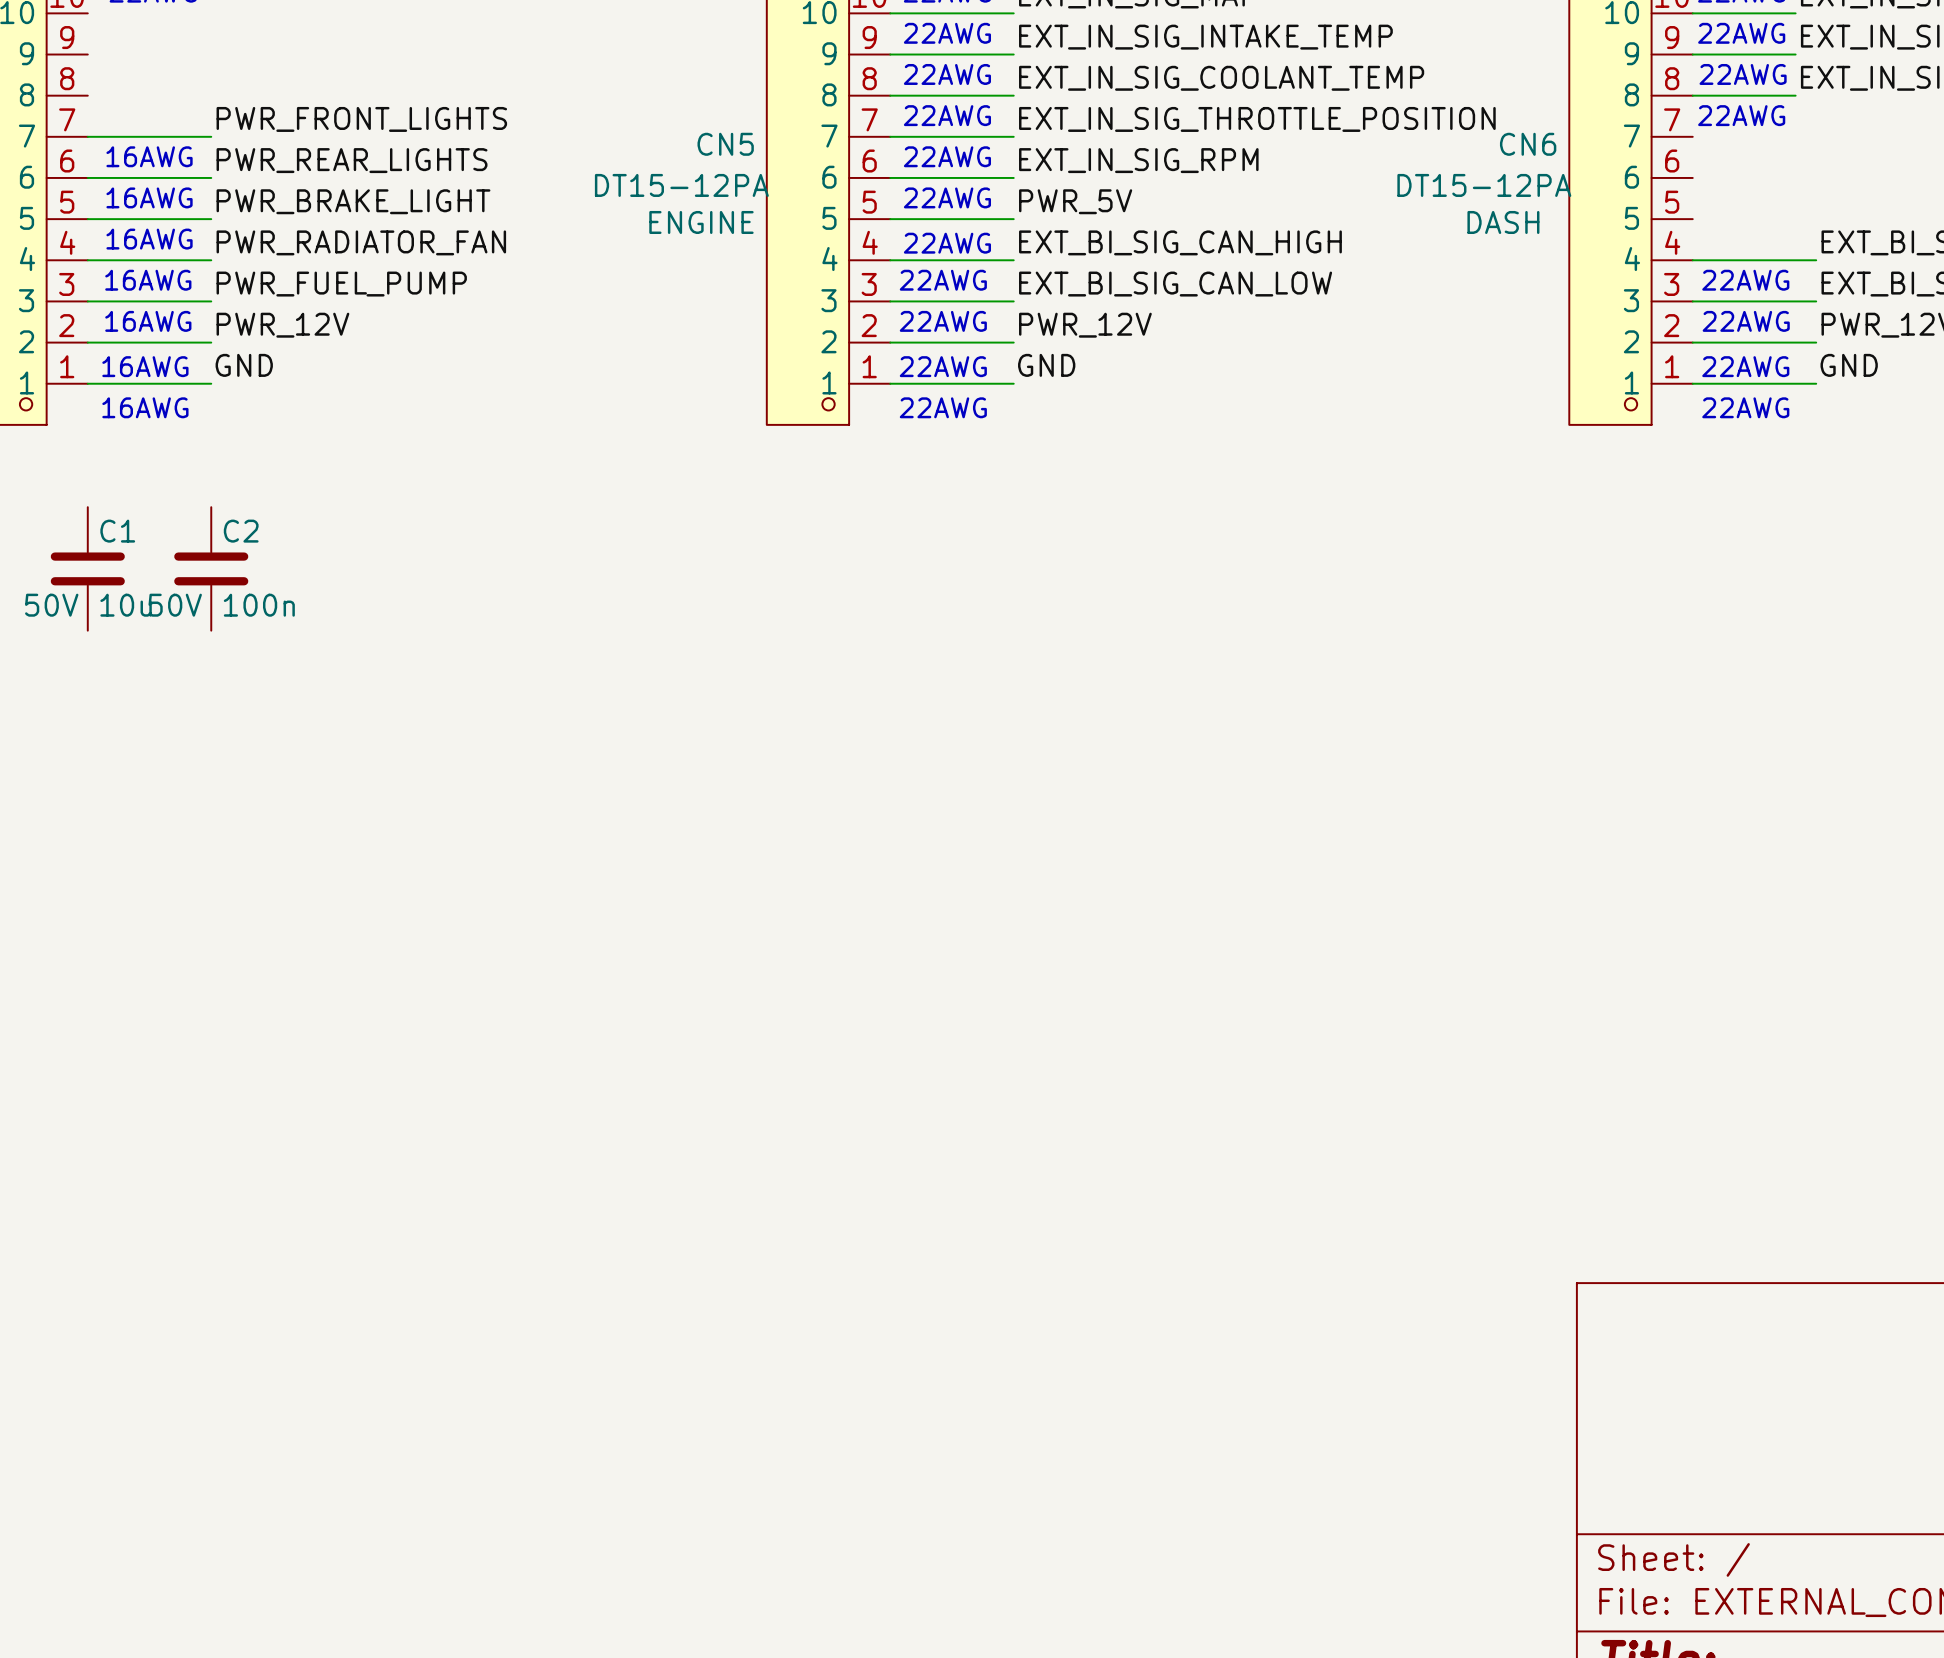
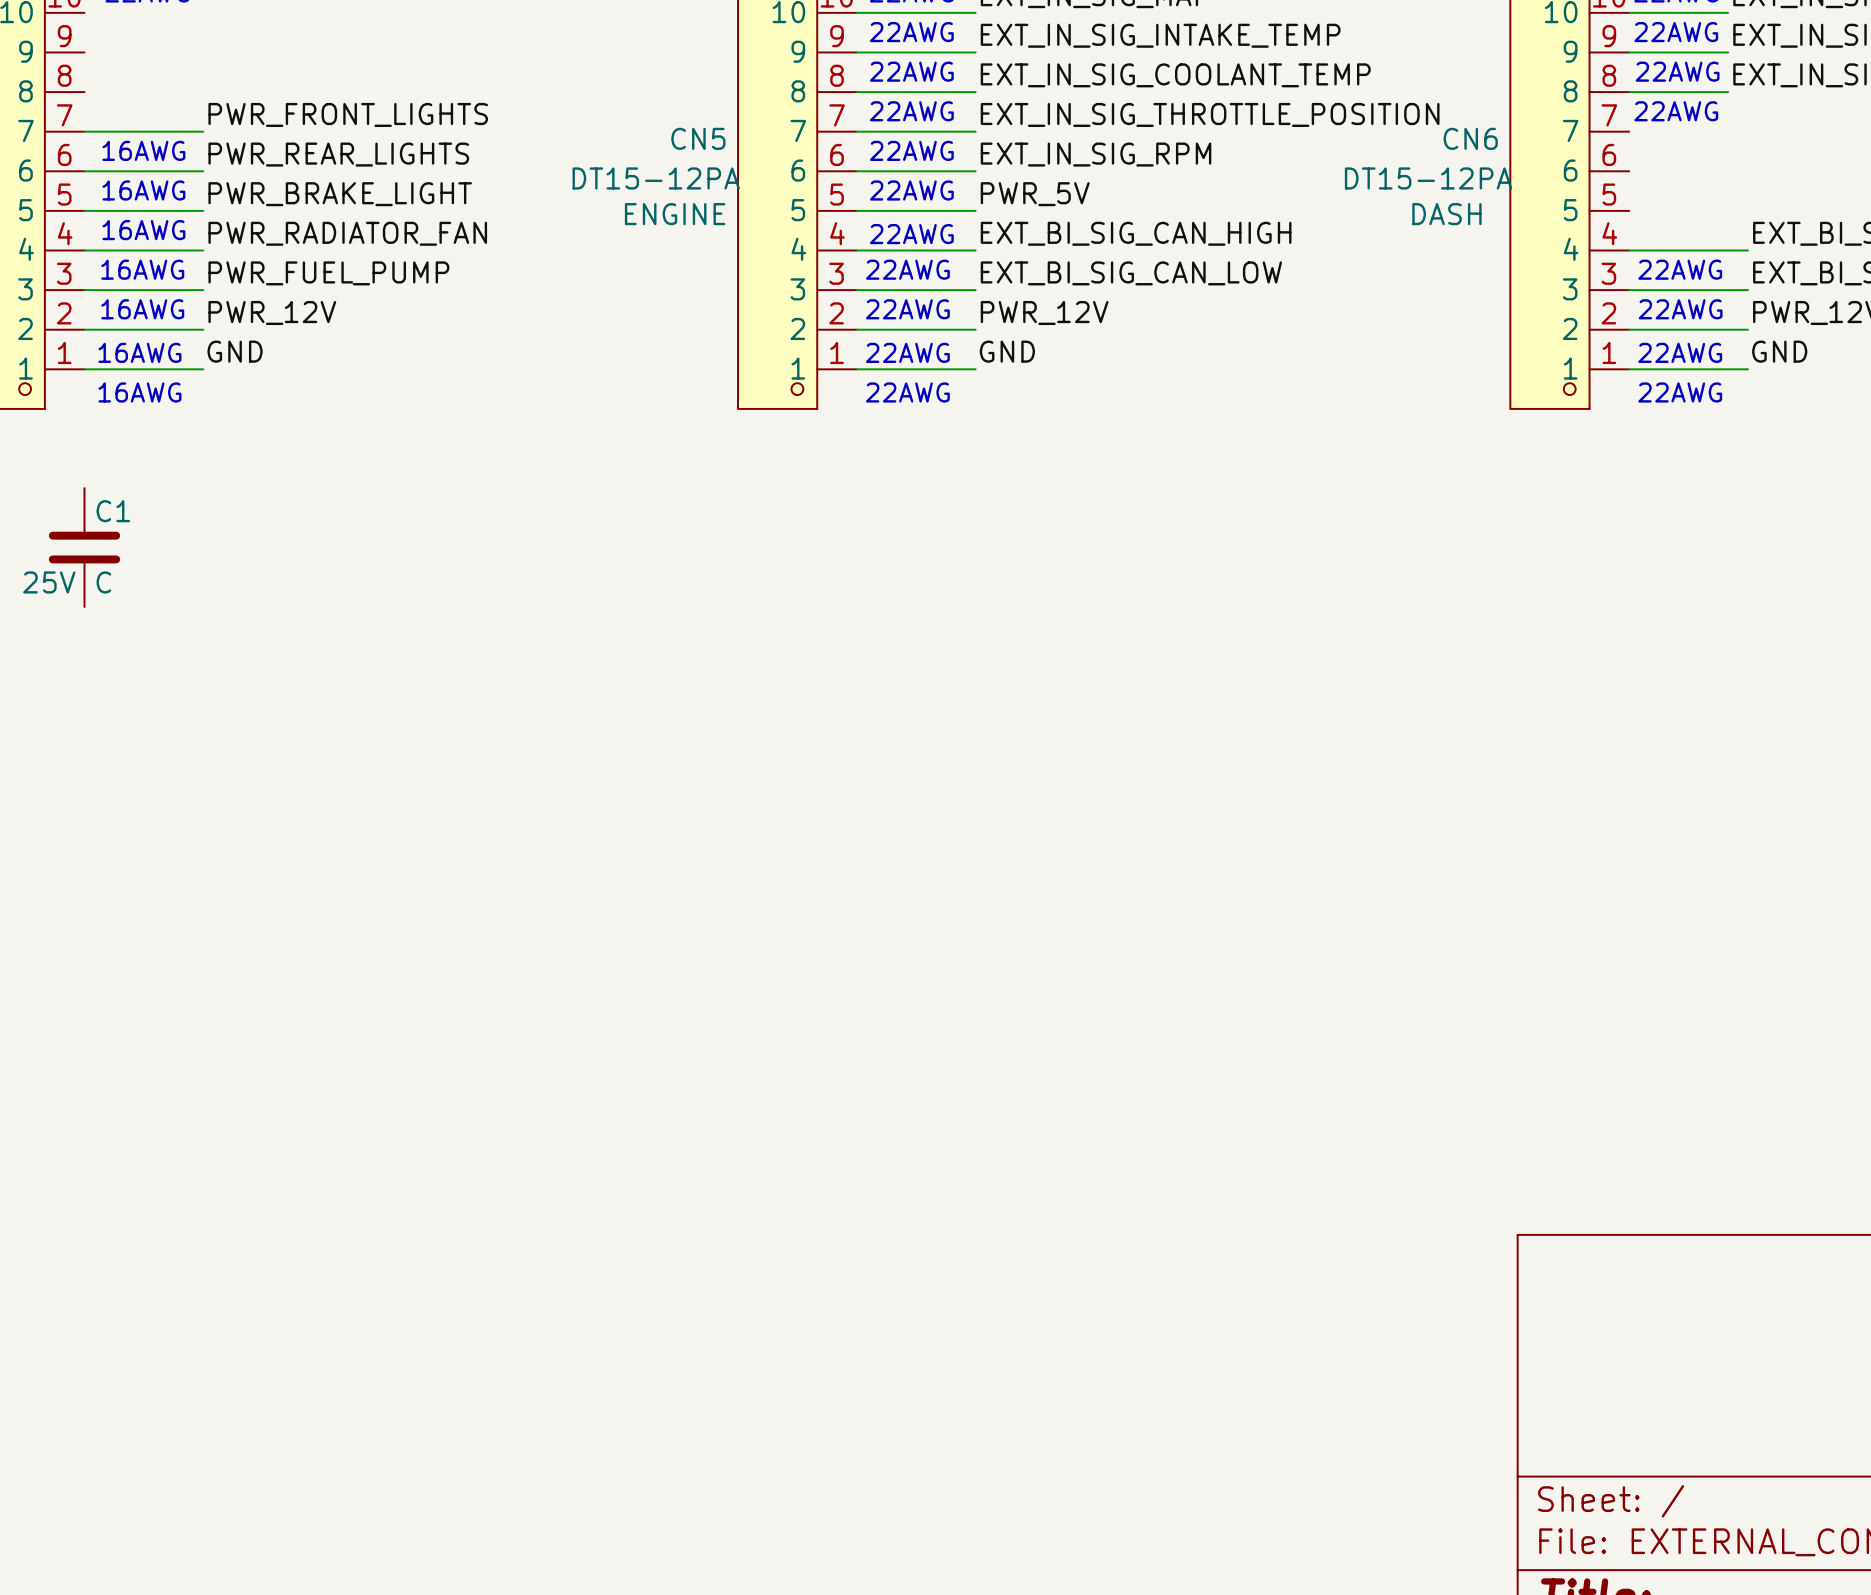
C2: 100n (211, 568) -> none
C1 text: 50V (51, 605) -> 25V (49, 582)
C1 value: 10u (126, 605) -> C (103, 582)

